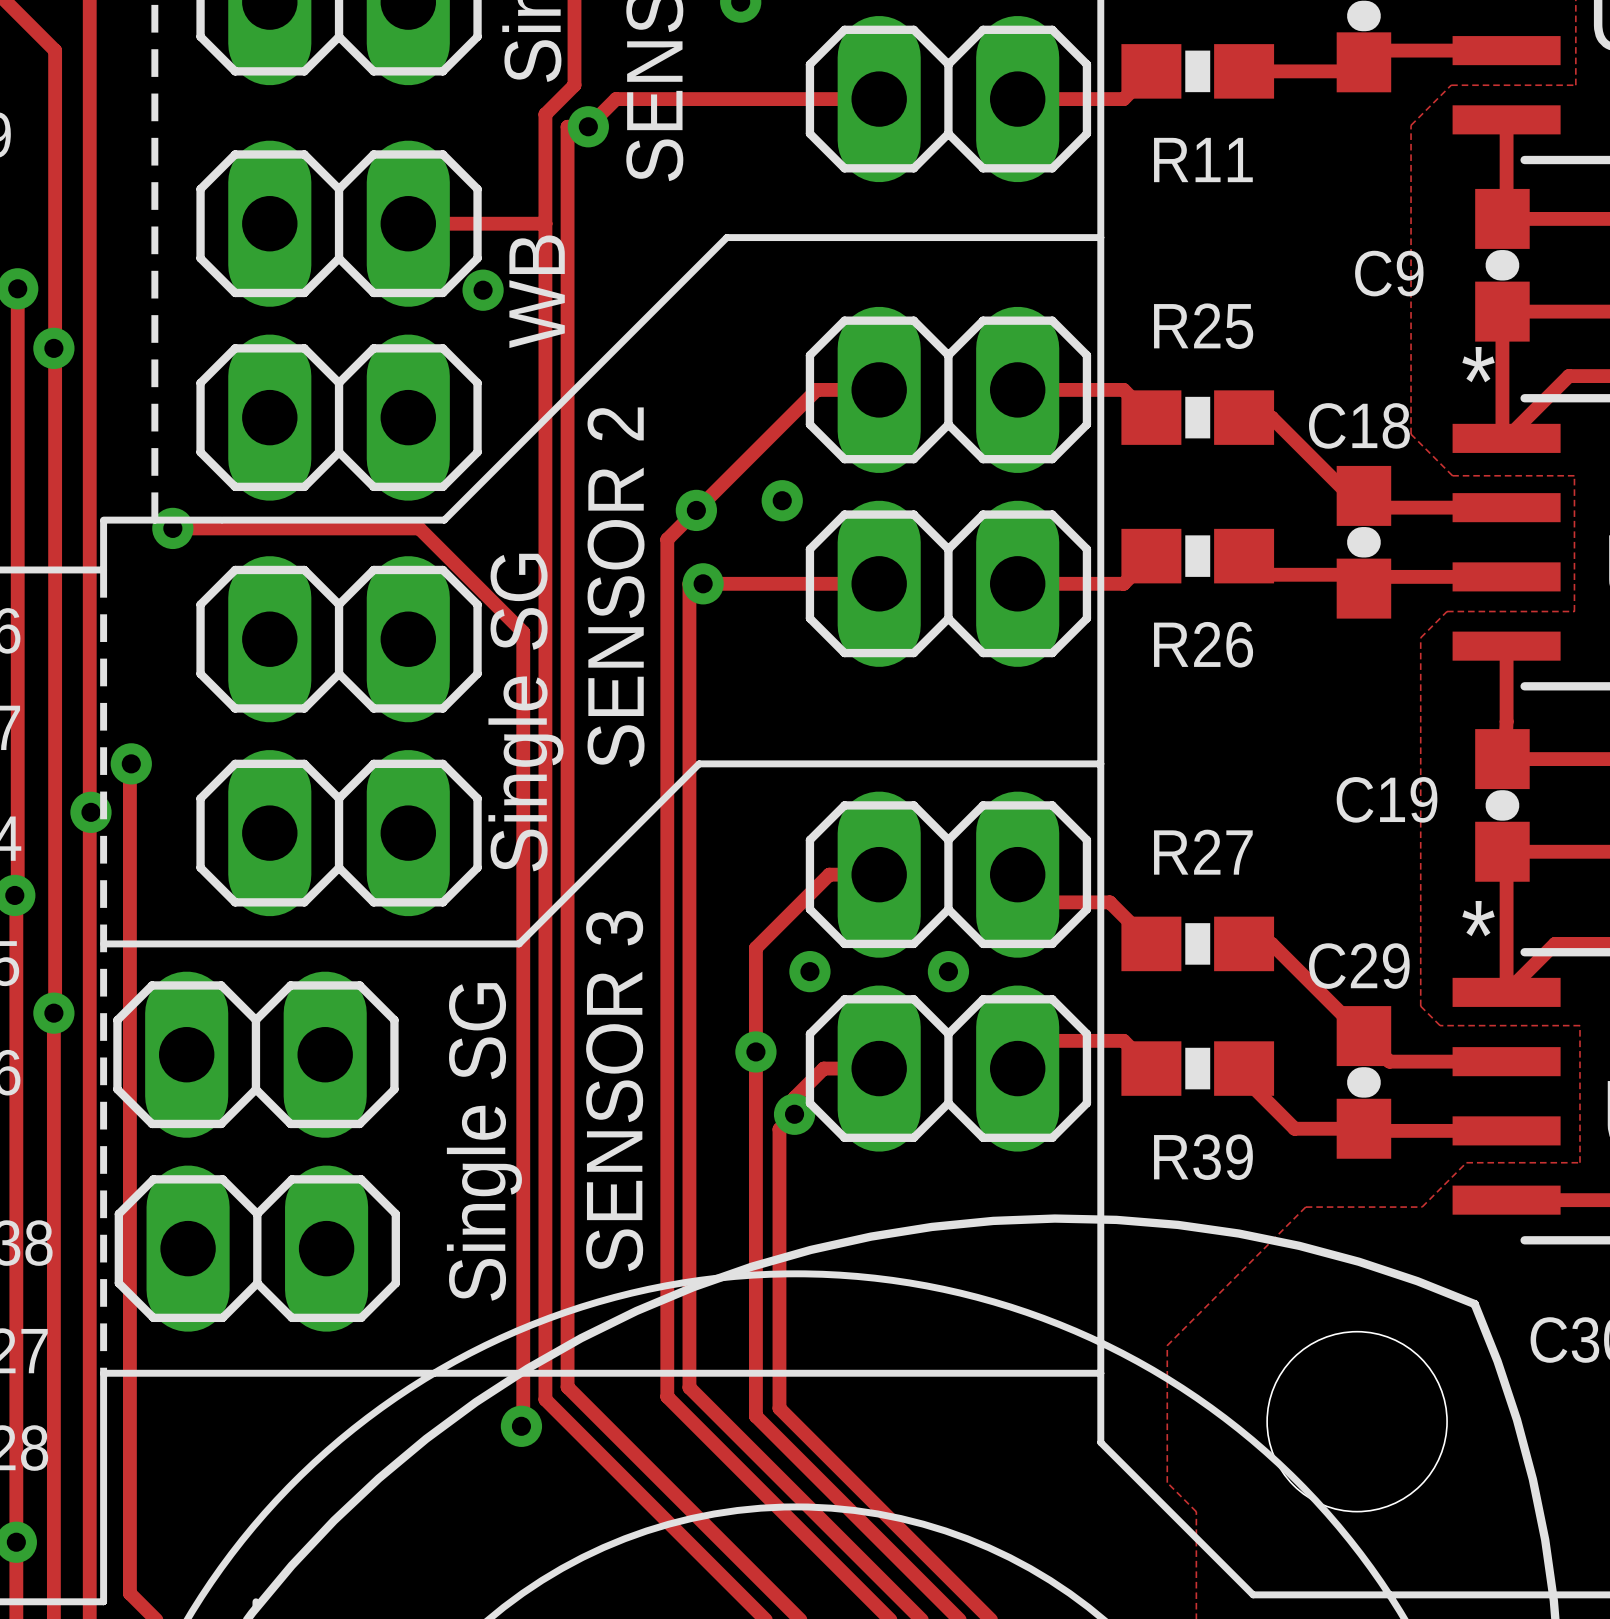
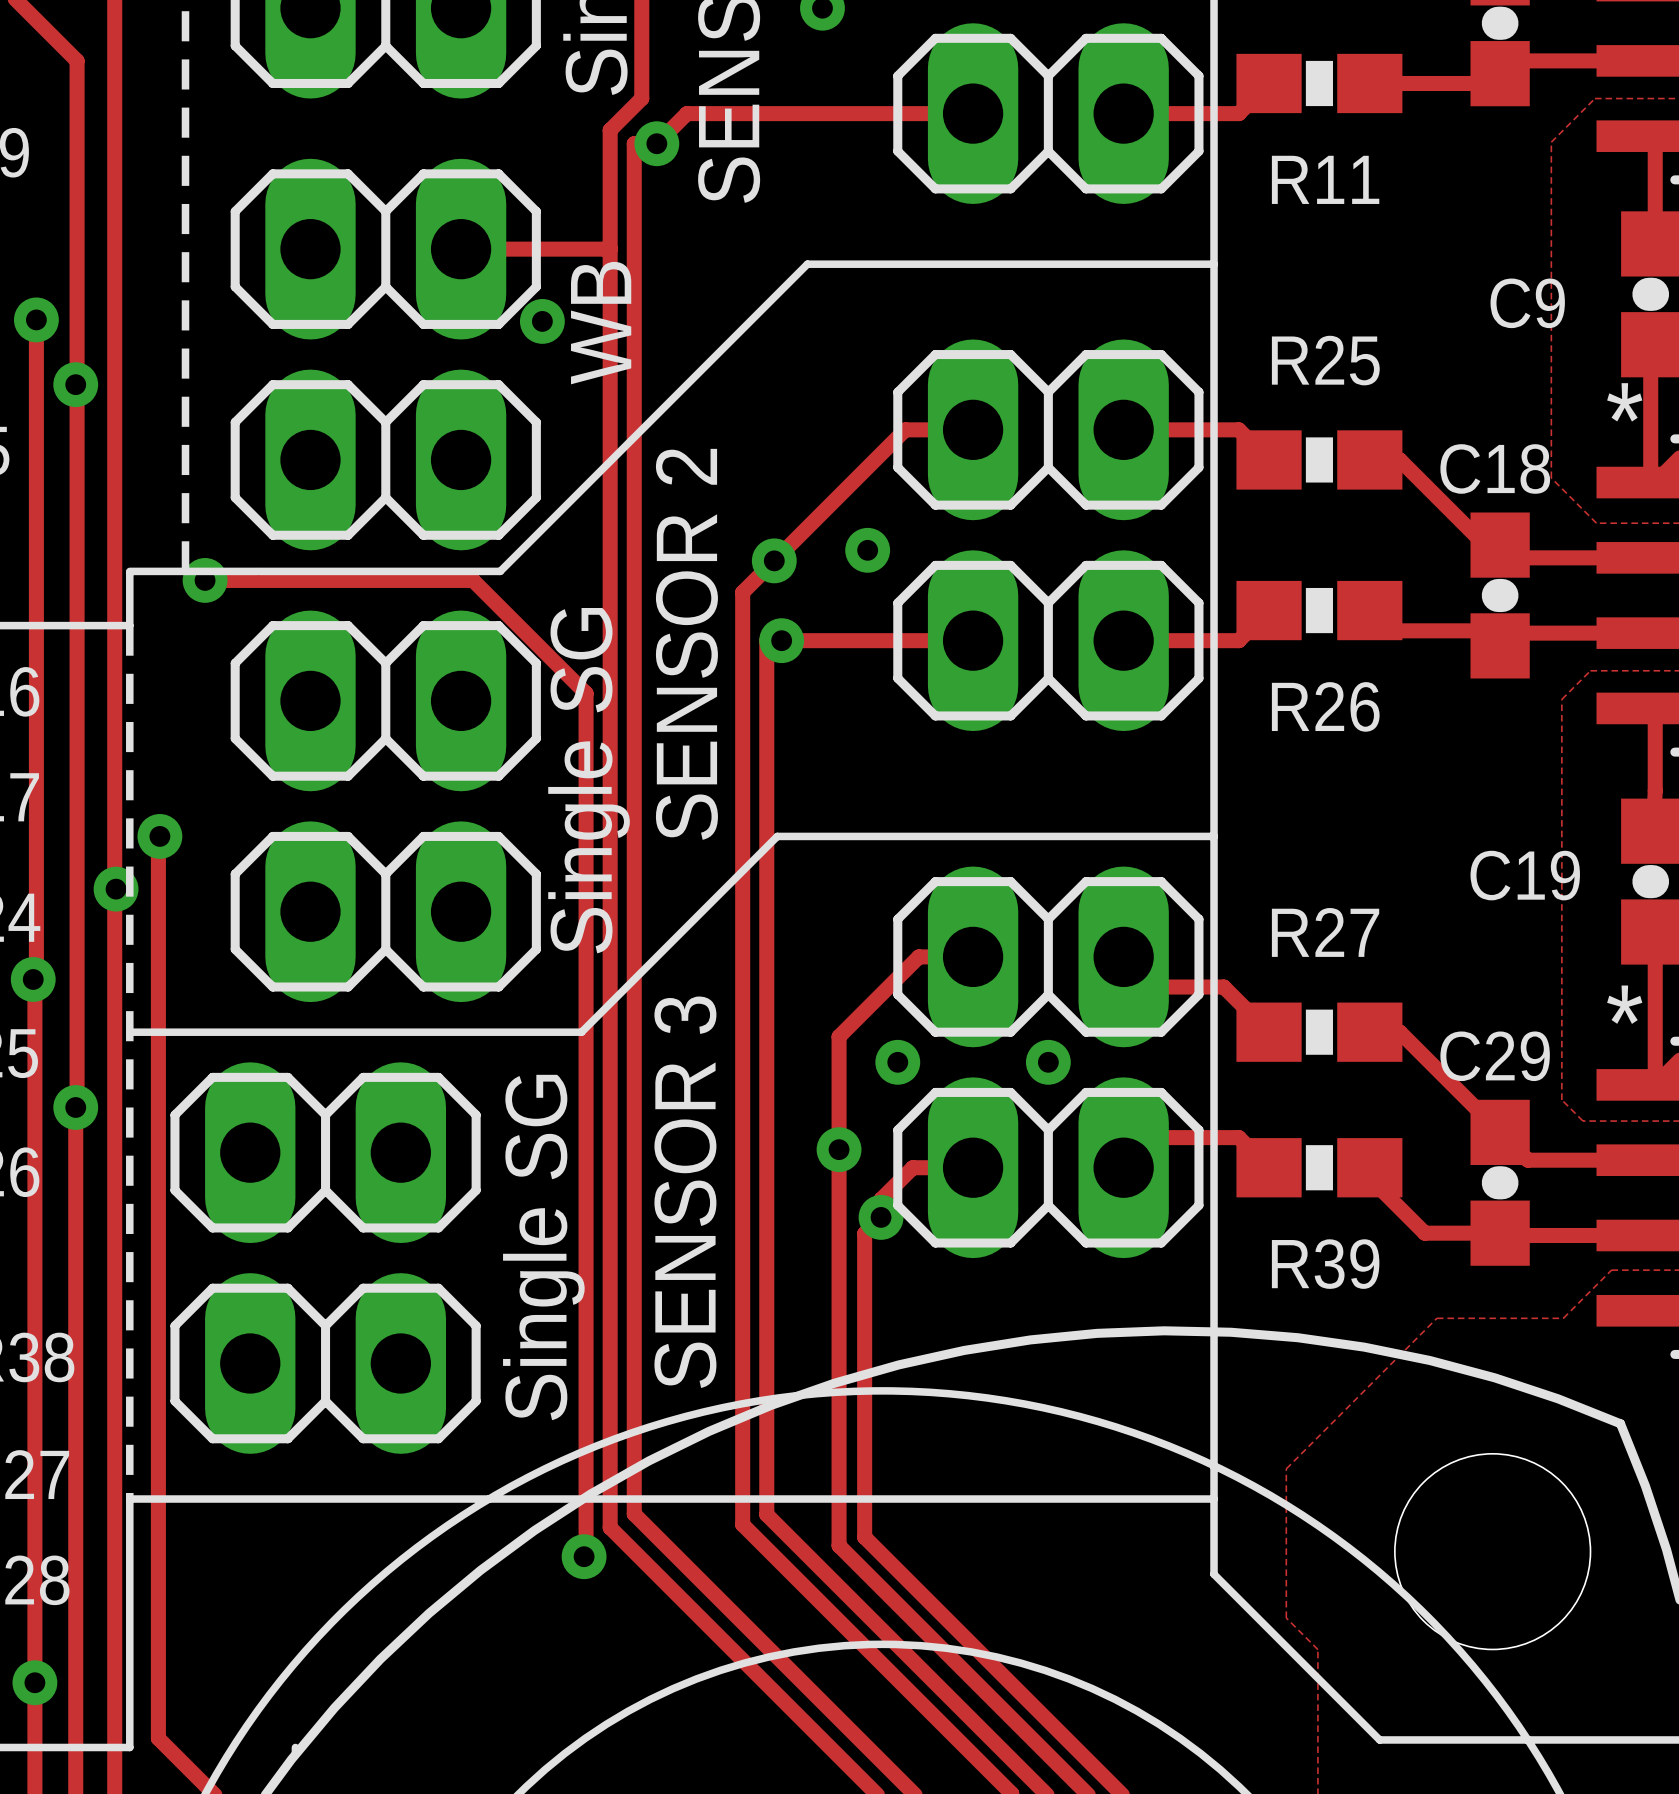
part position: (255, 1054) -> (325, 1152)
part position: (257, 1248) -> (325, 1363)

